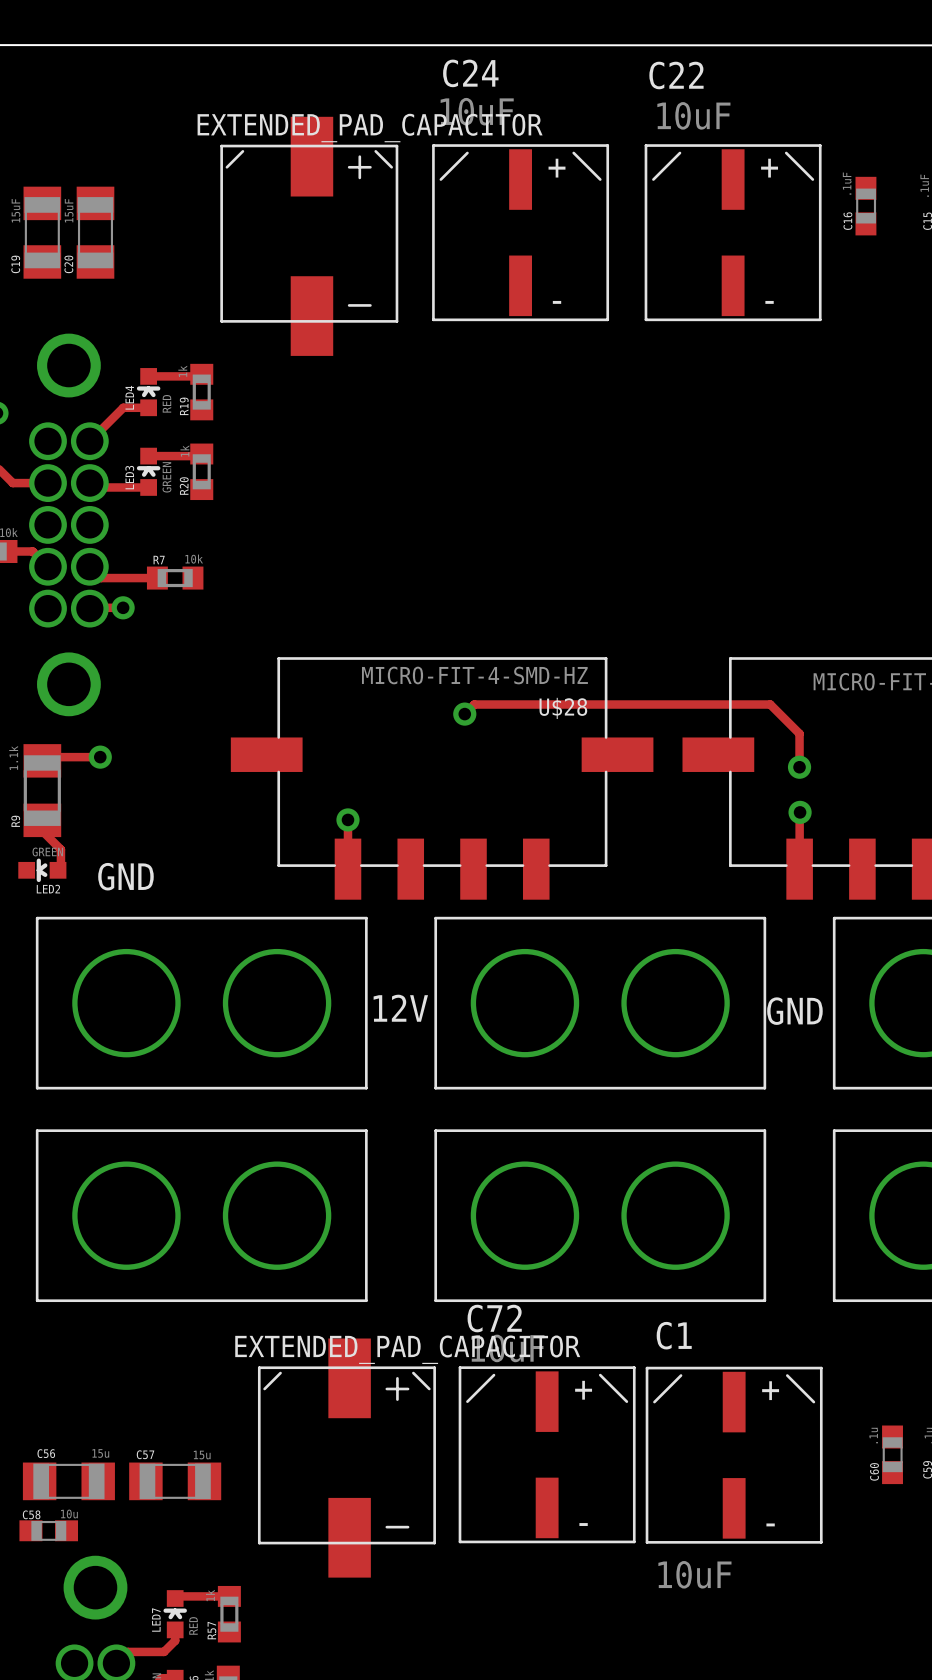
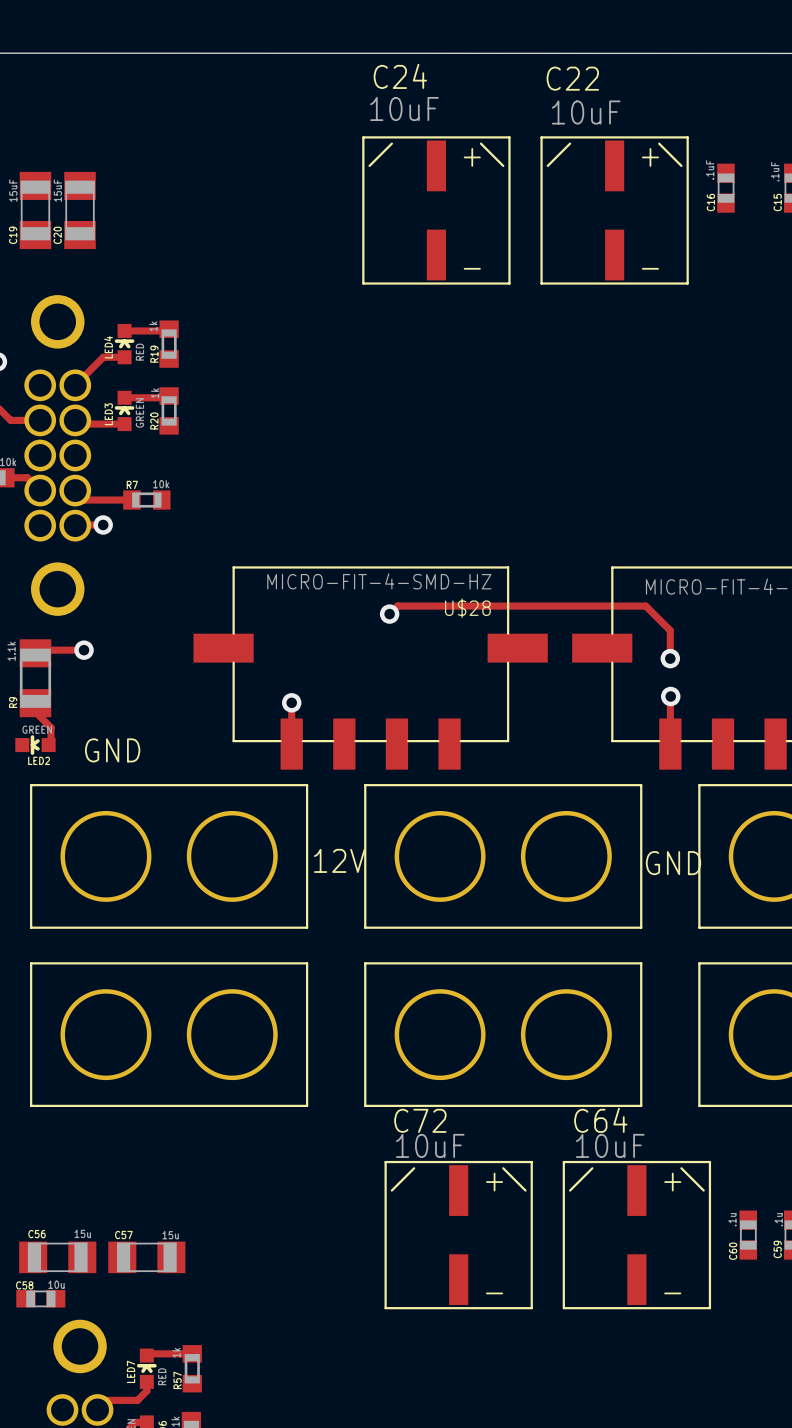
part: EXTENDED_PAD_CAPACITOR (309, 236) -> none
C64: none -> 10uF (636, 1235)
C1: 10uF (734, 1455) -> none
part: EXTENDED_PAD_CAPACITOR (346, 1458) -> none

